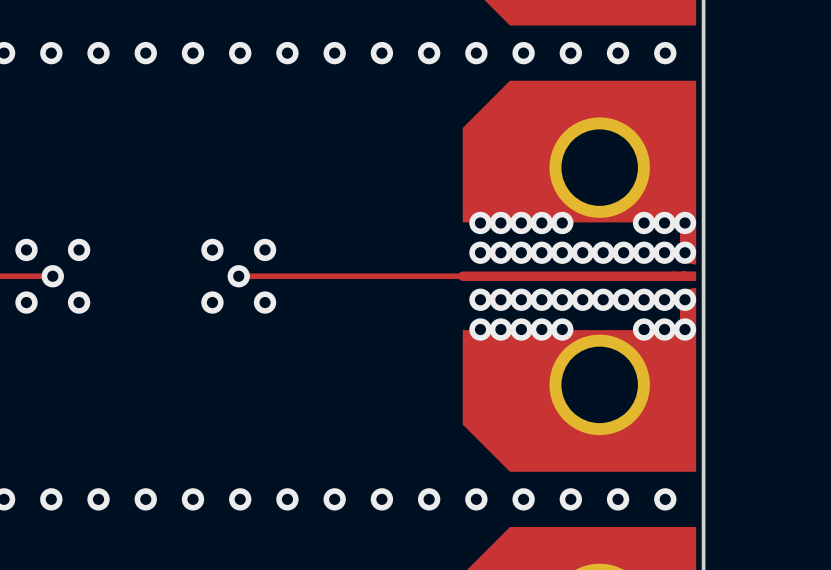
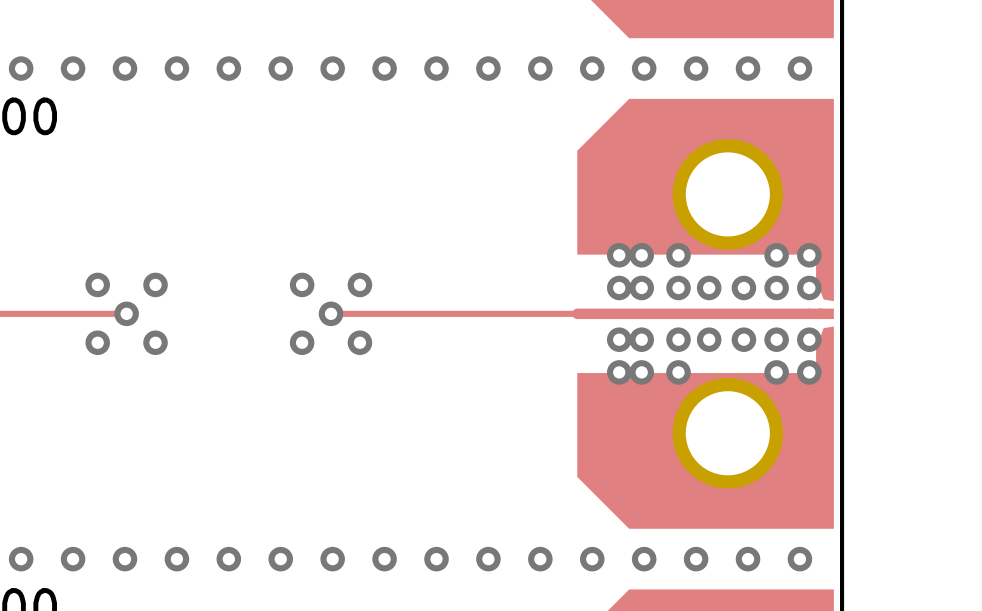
via: (480, 222) -> none
via: (541, 222) -> none
via: none -> (678, 255)
via: (562, 222) -> none
via: (664, 222) -> none
via: none -> (809, 255)
via: (684, 222) -> none
via: (480, 252) -> none
via: (541, 252) -> none
via: none -> (678, 287)
via: (562, 252) -> none
via: (603, 252) -> none
via: none -> (743, 287)
via: (623, 252) -> none
via: (664, 252) -> none
via: none -> (809, 287)
via: (684, 252) -> none
via: (480, 299) -> none
via: (541, 299) -> none
via: none -> (678, 339)
via: (562, 299) -> none
via: (603, 299) -> none
via: none -> (743, 339)
via: (623, 299) -> none
via: (664, 299) -> none
via: none -> (809, 339)
via: (684, 299) -> none
via: (480, 329) -> none
via: (541, 329) -> none
via: none -> (678, 372)
via: (562, 329) -> none
via: (664, 329) -> none
via: none -> (809, 372)
via: (684, 329) -> none

